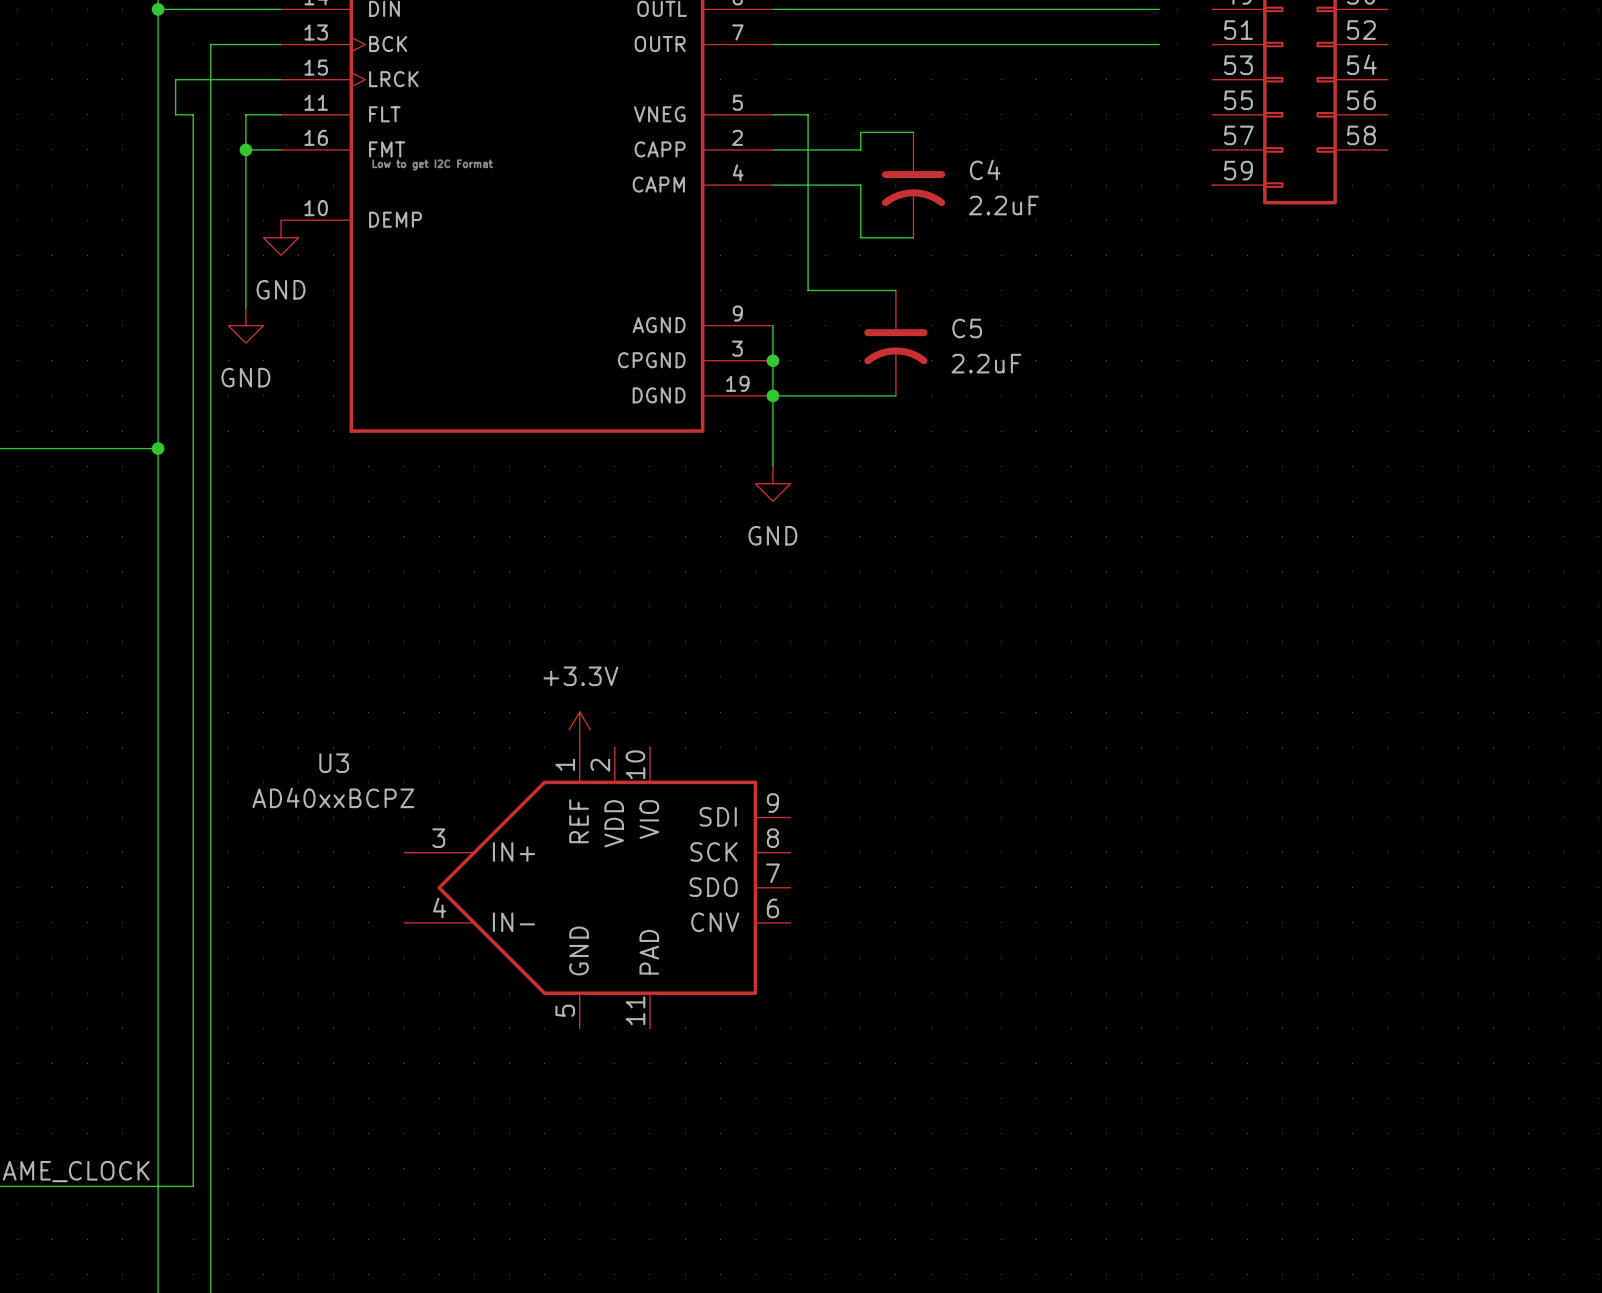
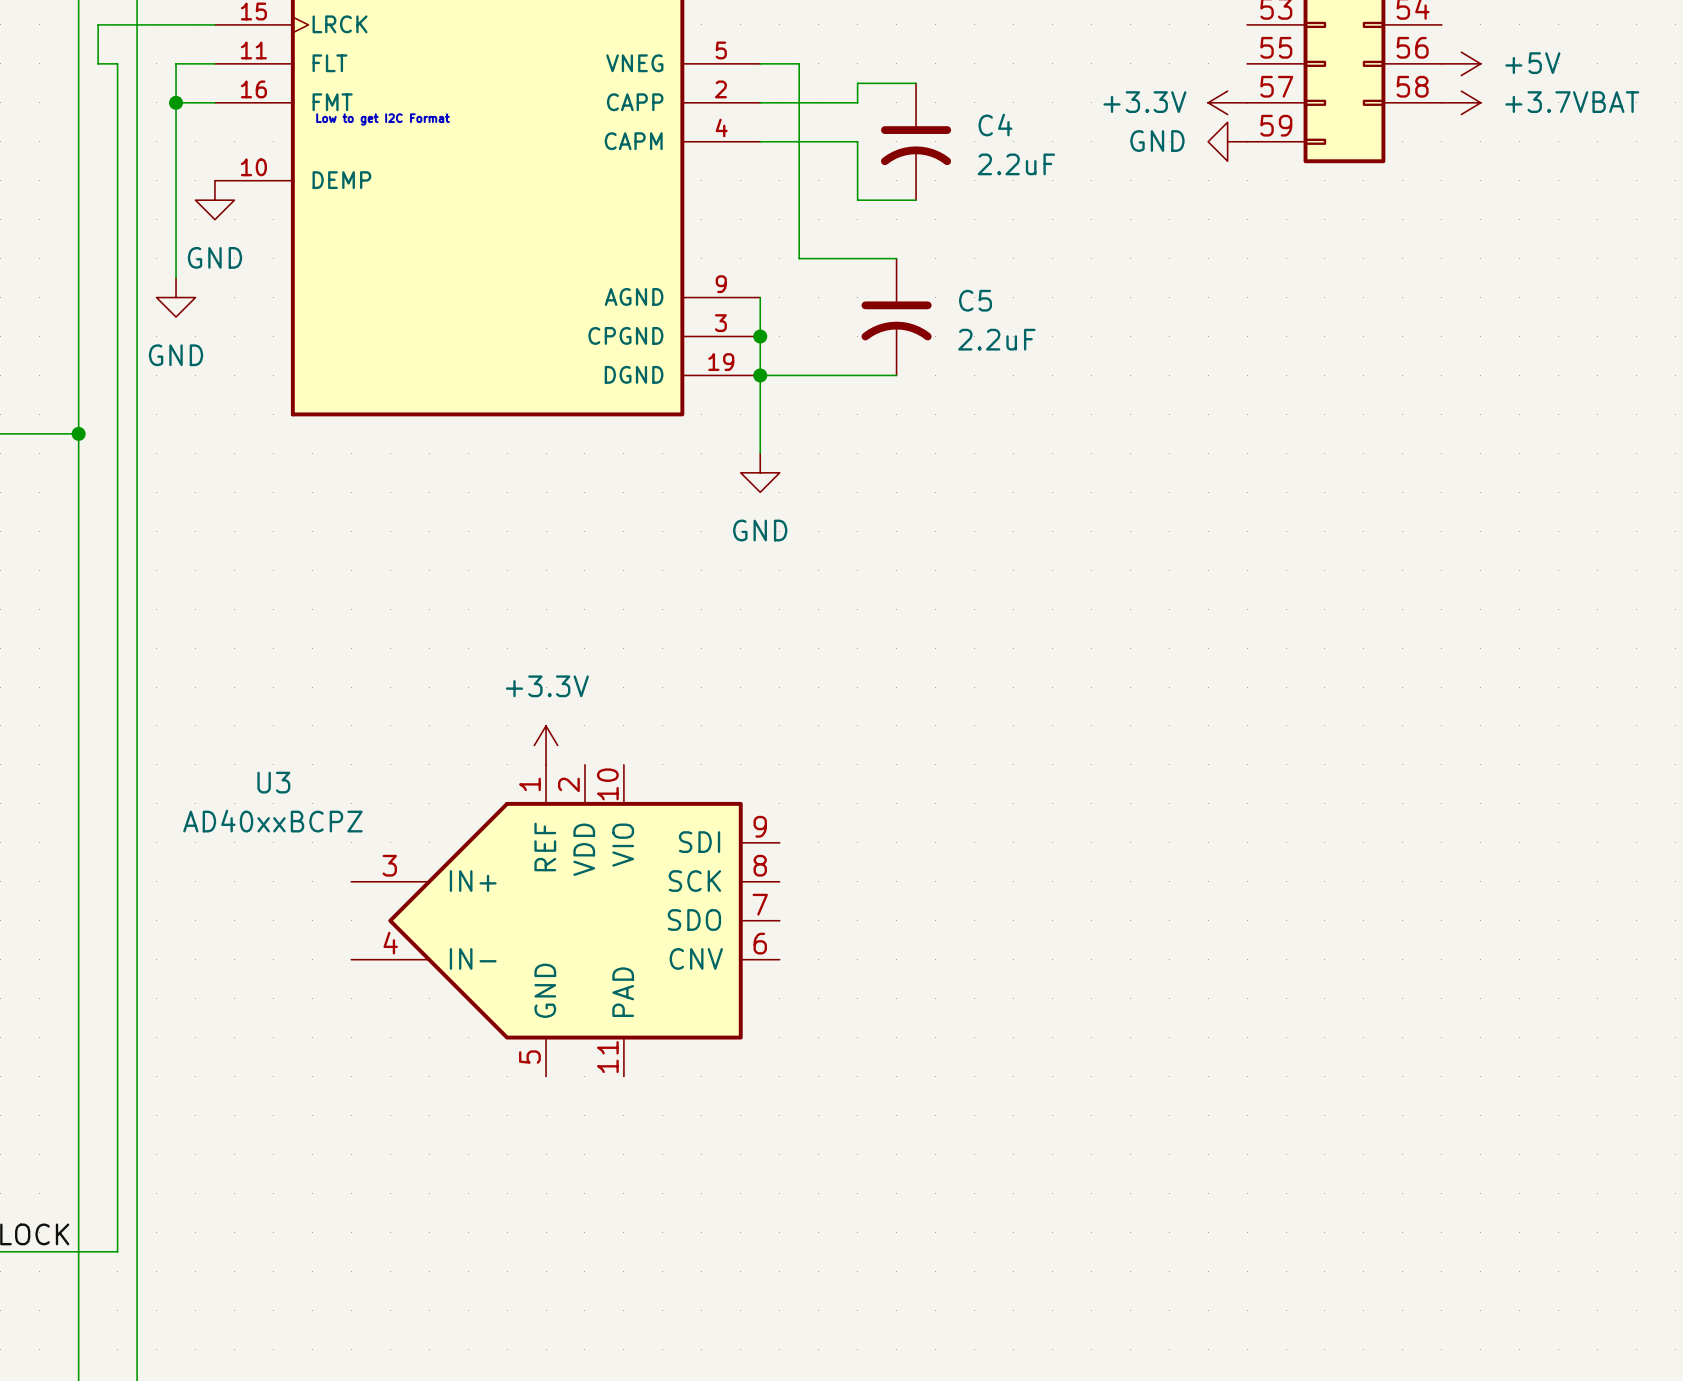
power symbol: none -> +5V (1461, 63)
power symbol: none -> +3.3V (1227, 102)
power symbol: none -> +3.7VBAT (1461, 102)
power symbol: none -> GND (1227, 141)

